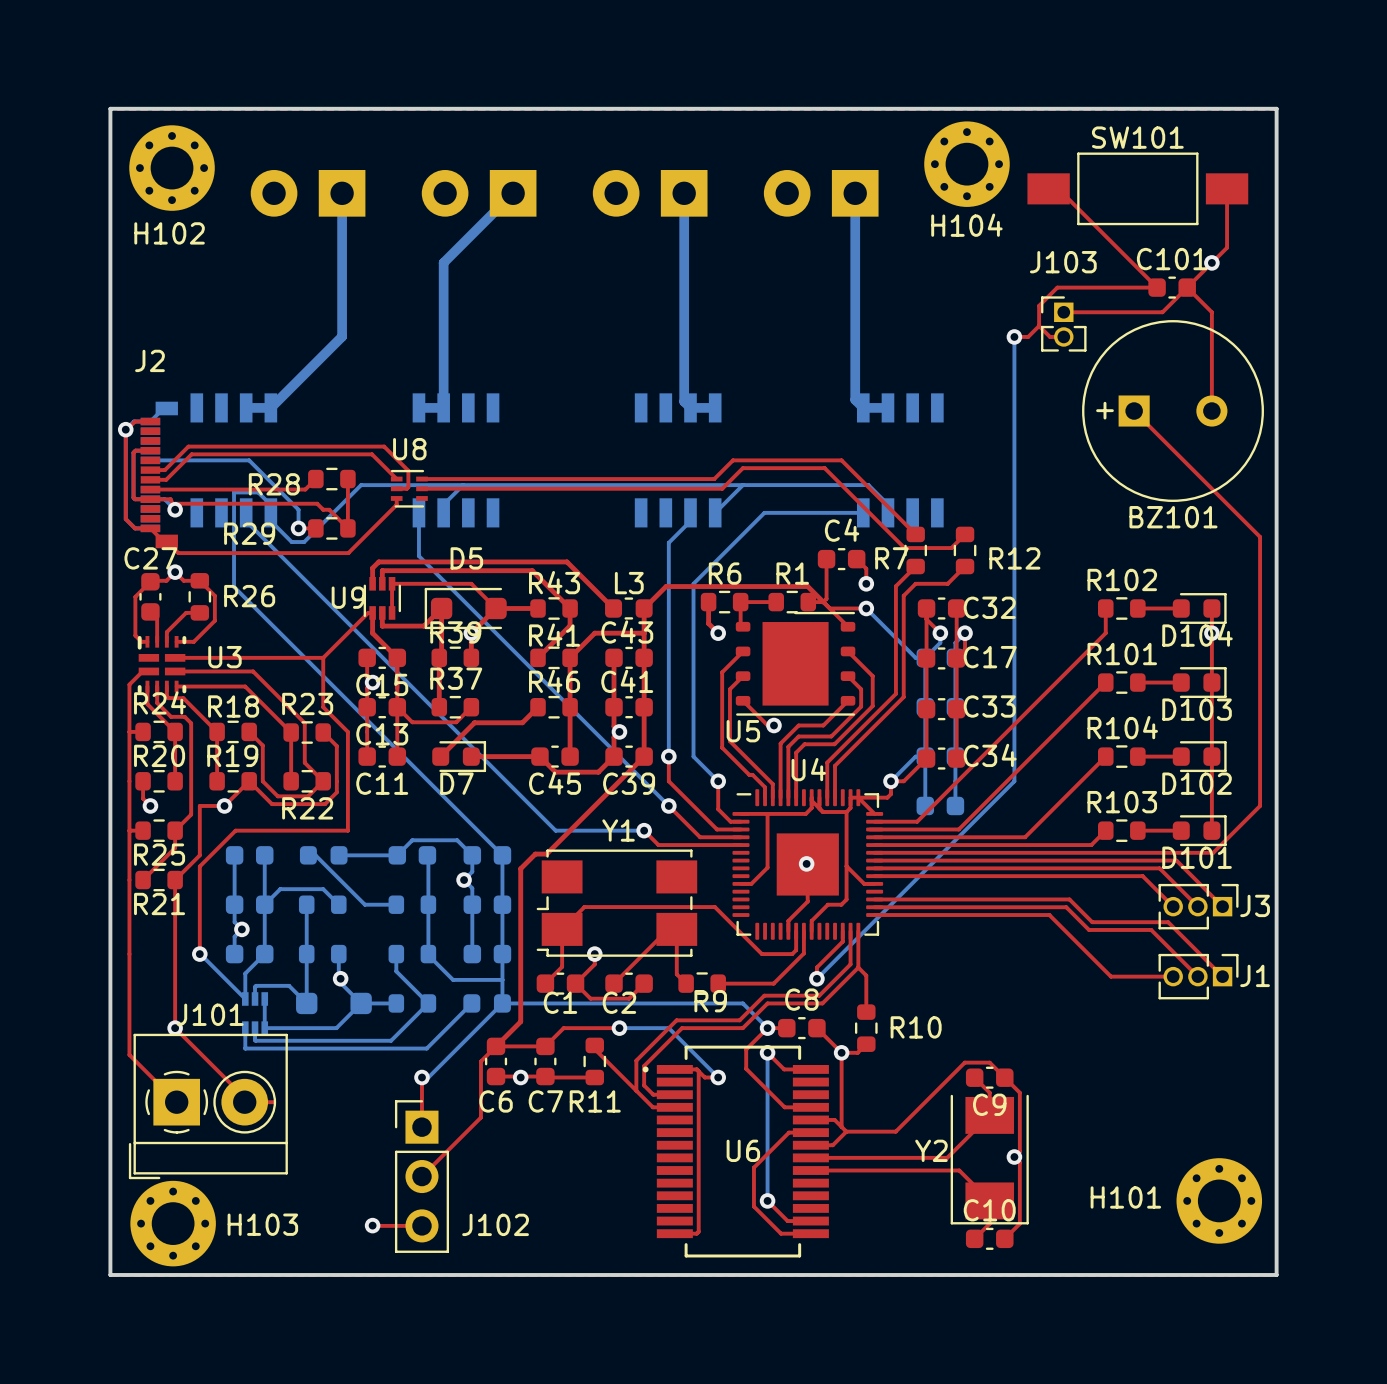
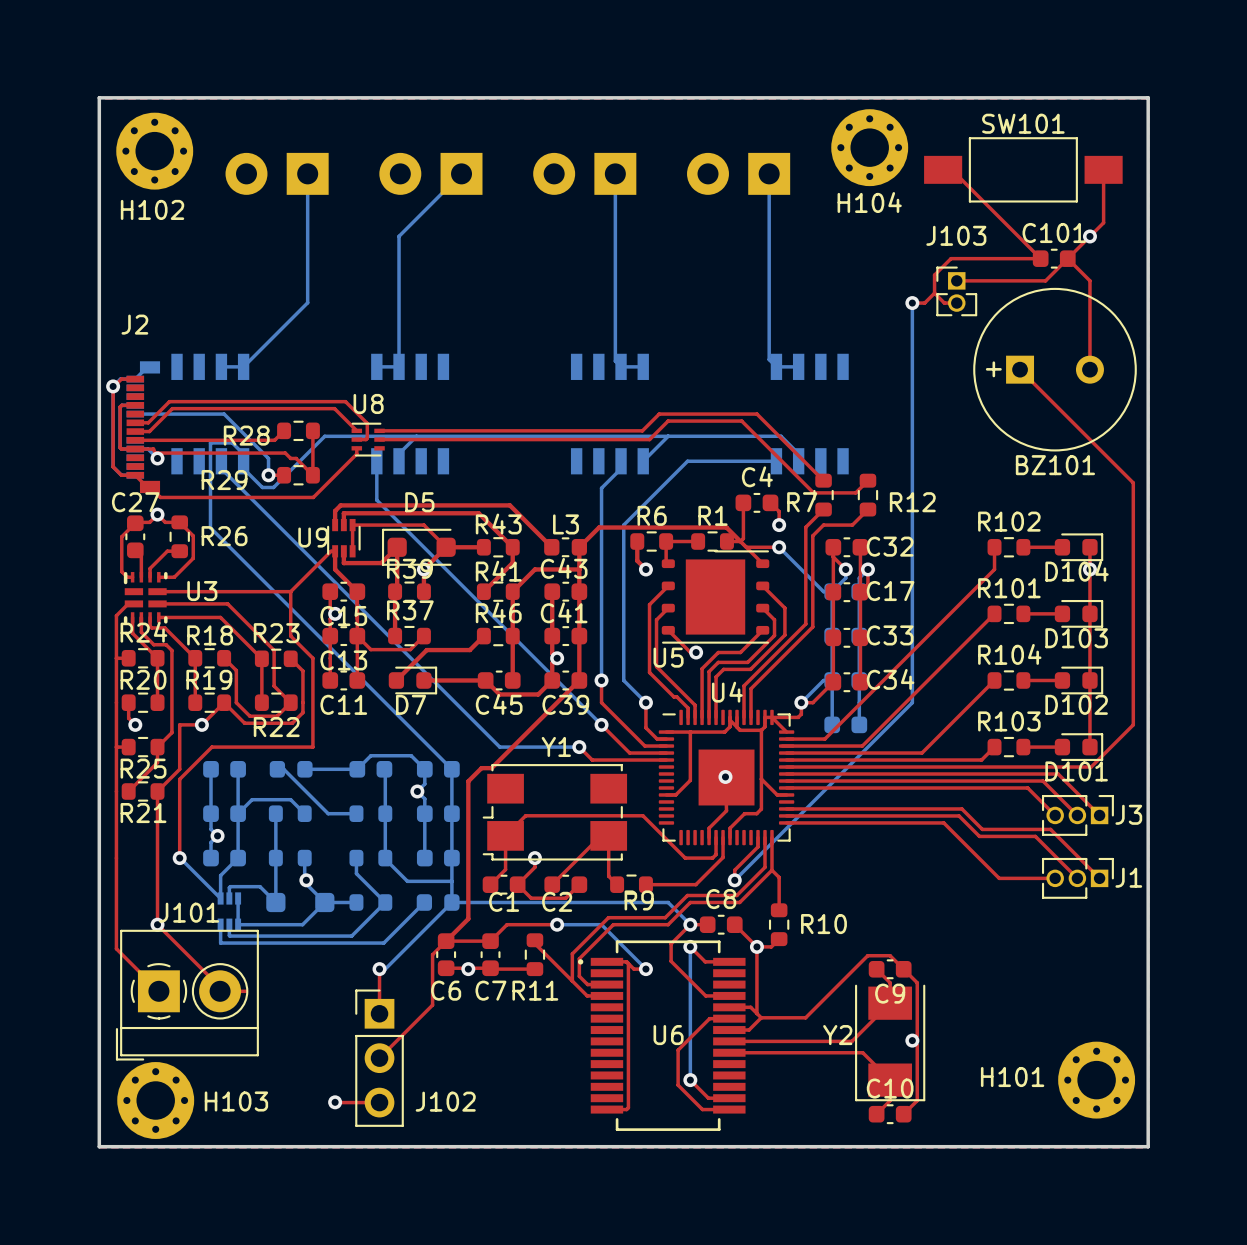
bottom track width: thick (342, 193) (342, 336) (270, 407) (246, 407) -> thin (307, 173) (307, 302) (243, 366) (221, 366)
bottom track width: thick (513, 193) (443, 262) (443, 407) (418, 407) -> thin (461, 173) (399, 236) (399, 366) (376, 366)
bottom track width: thick (684, 193) (684, 401) (690, 407) (715, 407) -> thin (615, 173) (615, 361) (621, 366) (643, 366)
bottom track width: thick (855, 193) (855, 399) (863, 407) (887, 407) -> thin (769, 173) (769, 359) (776, 366) (798, 366)

